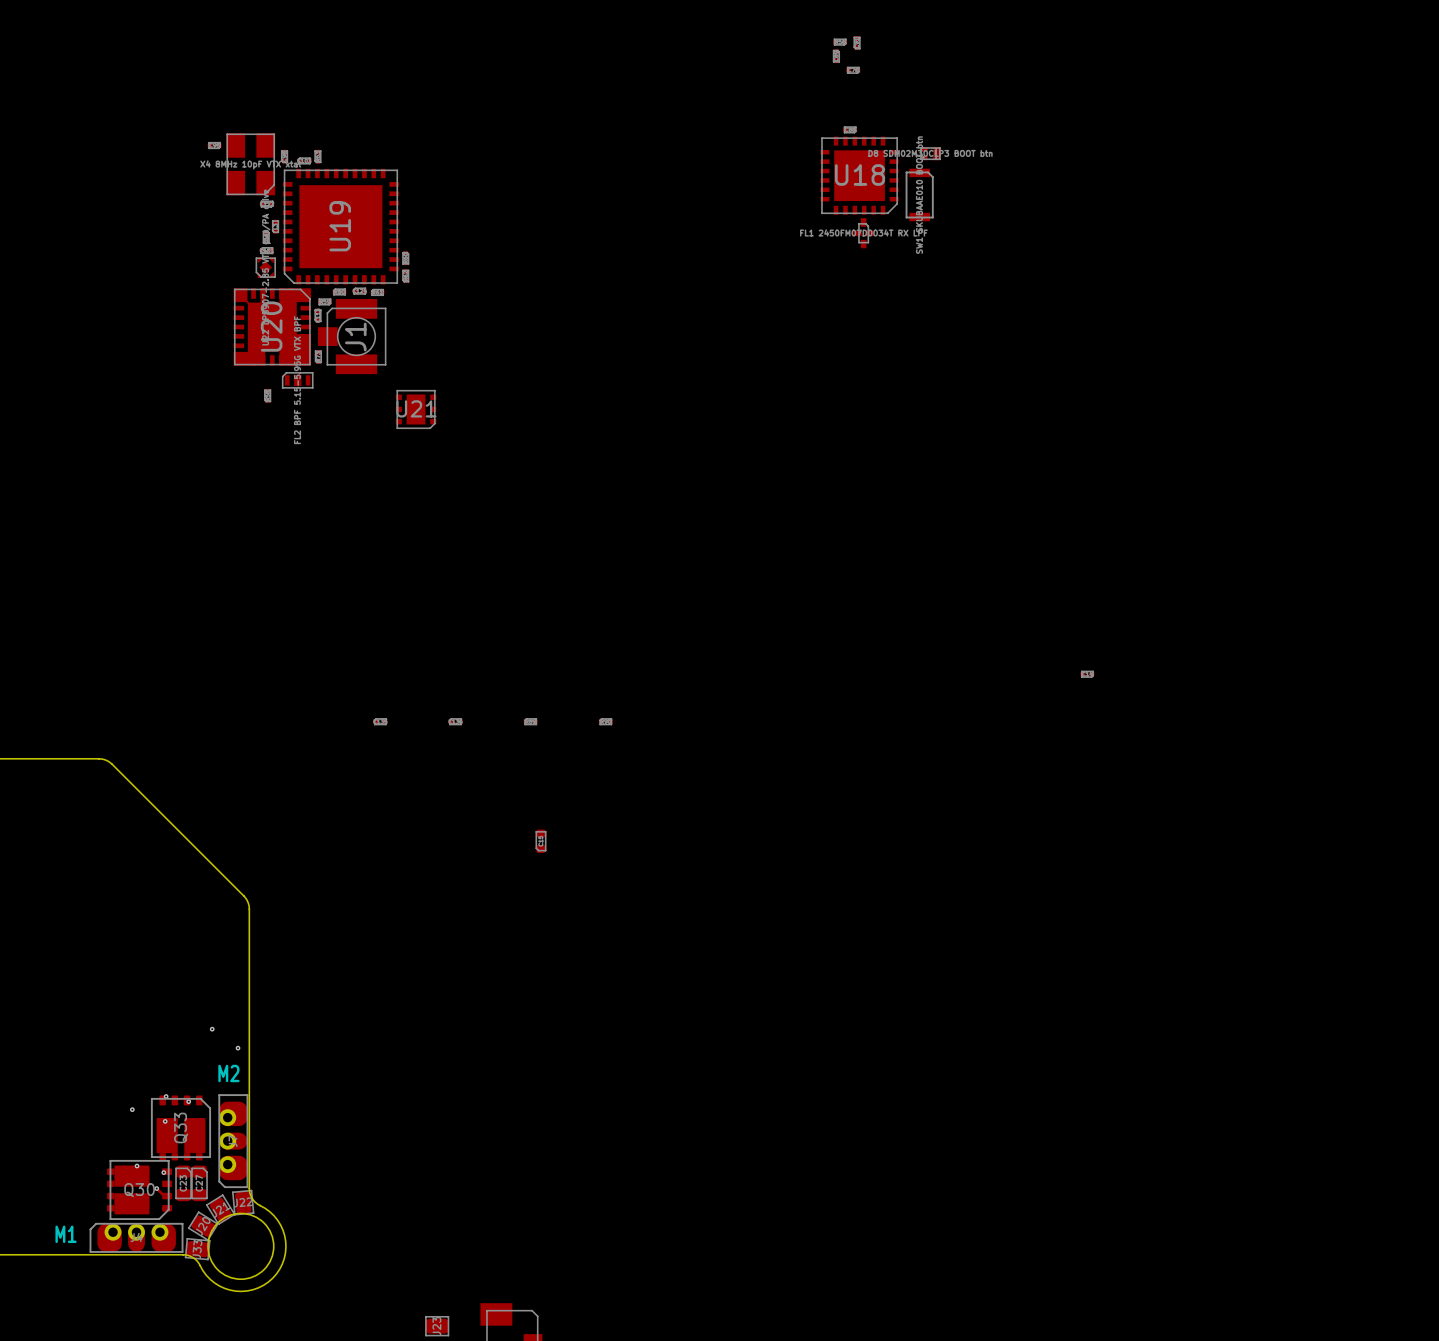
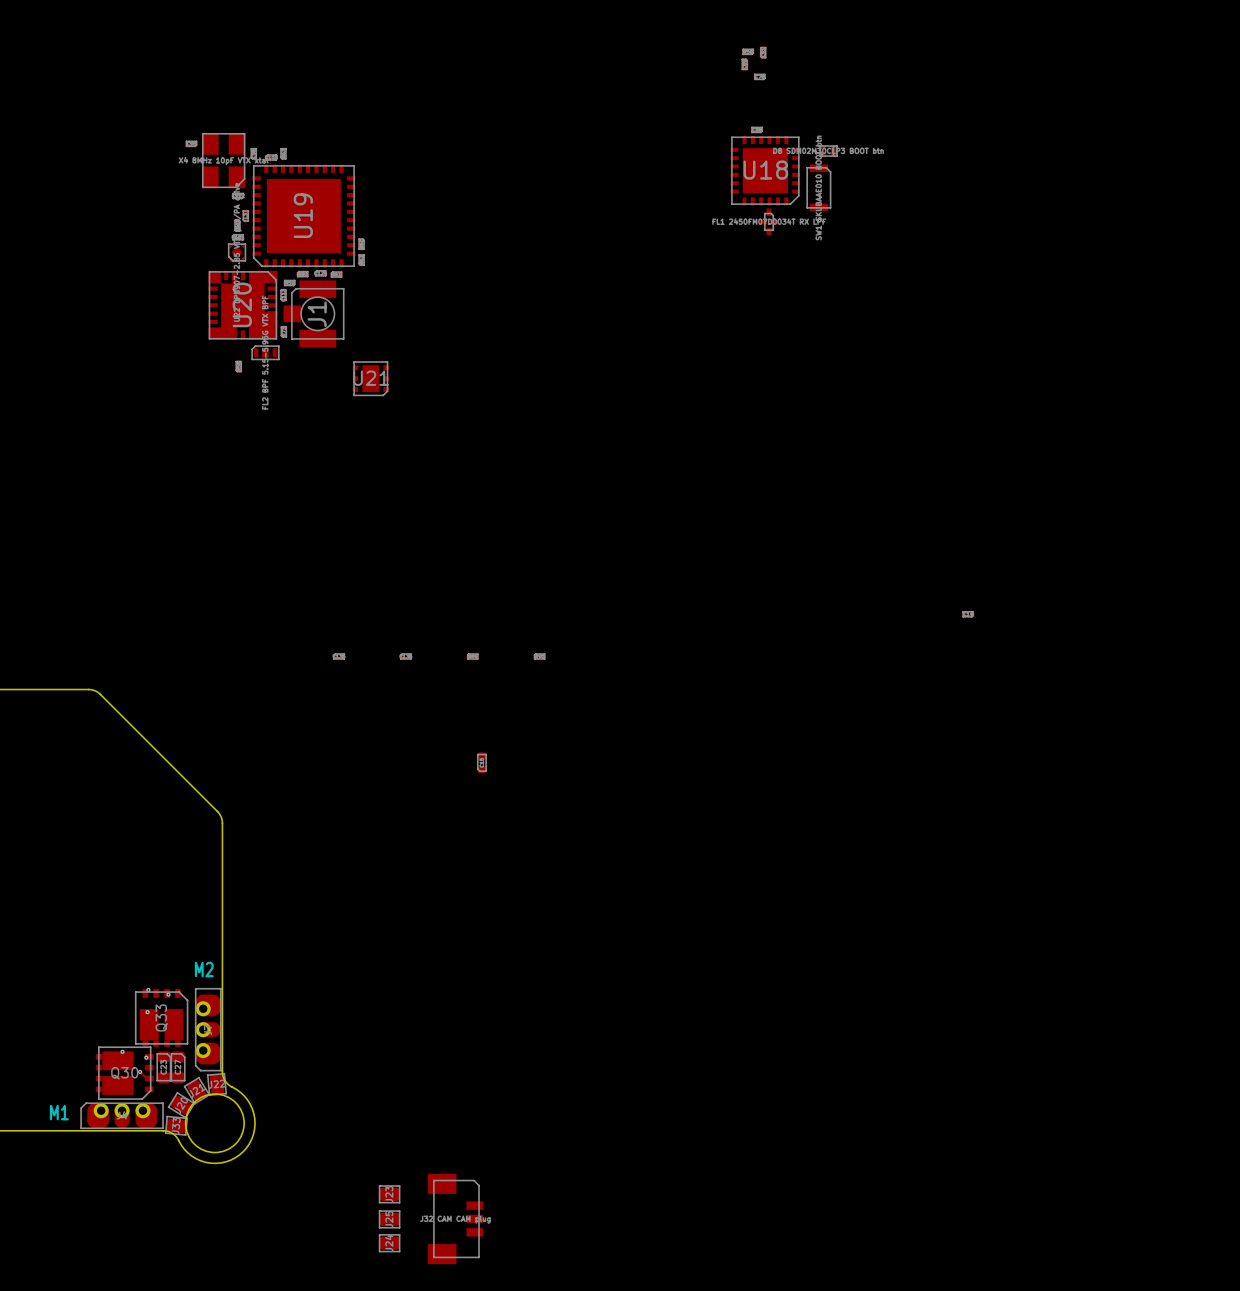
via: (212, 1029) -> none
via: (238, 1048) -> none
via: (132, 1109) -> none

